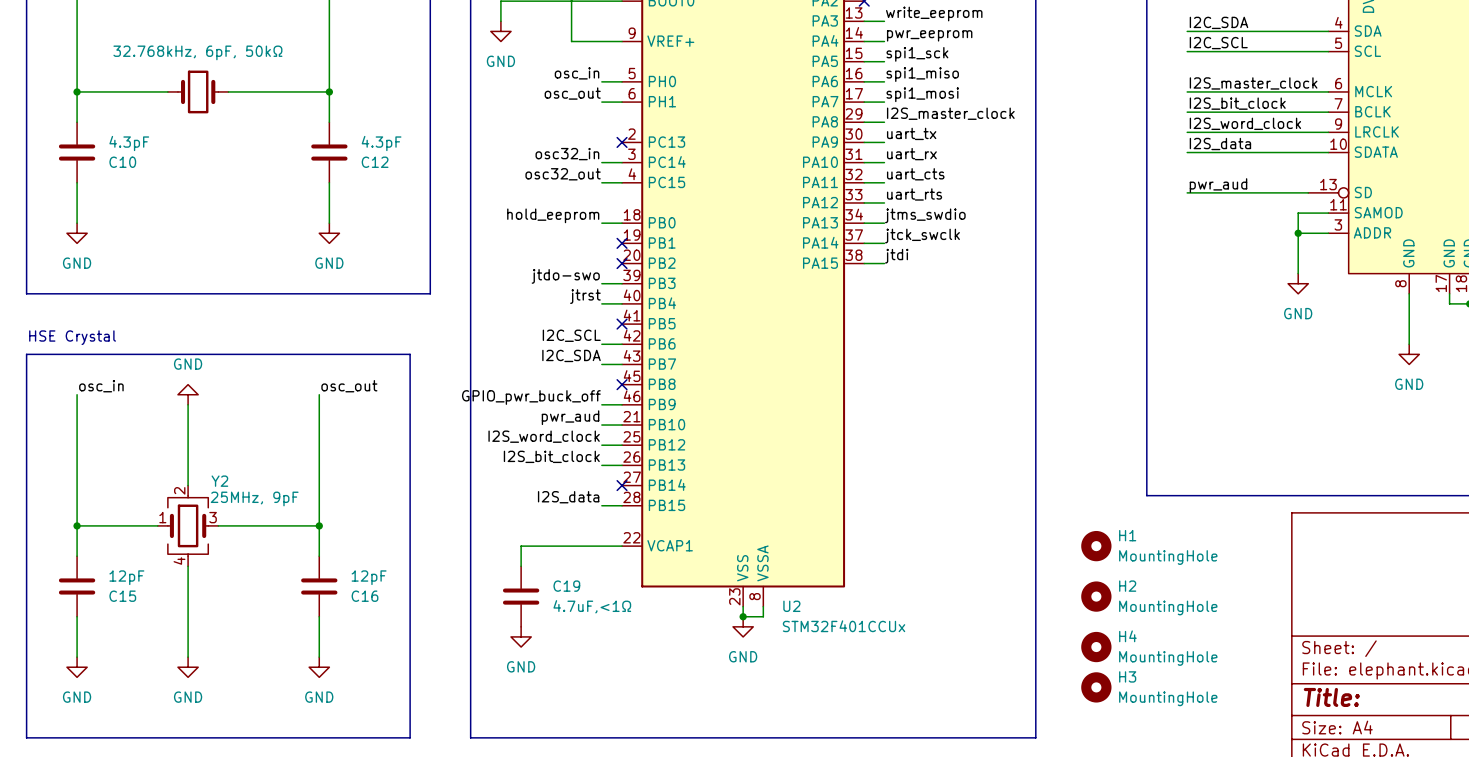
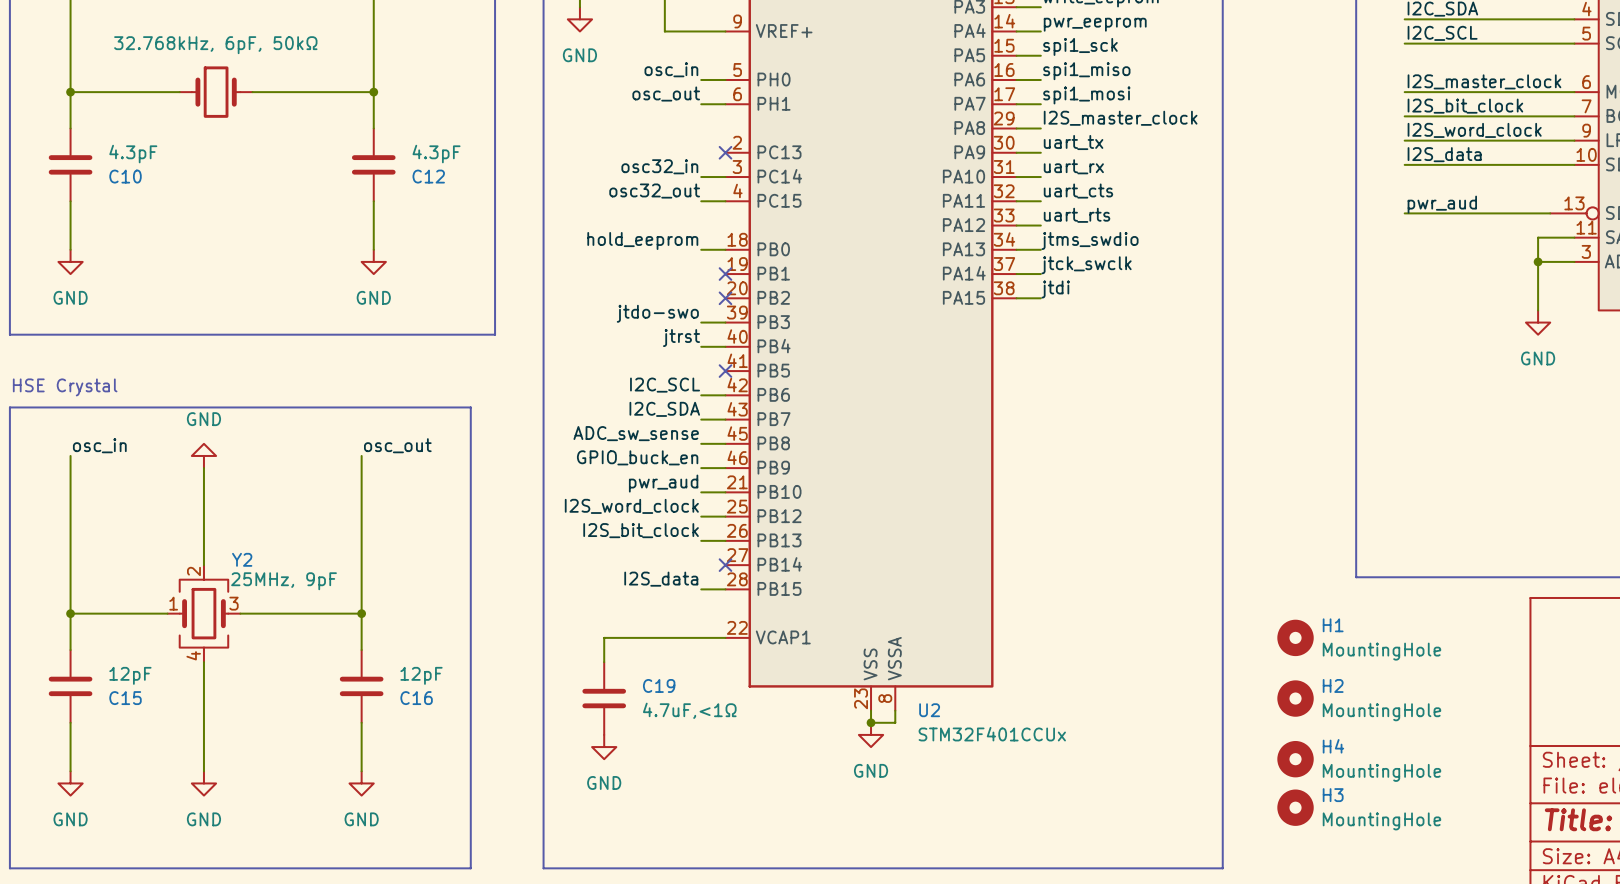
label: none -> ADC_sw_sense (636, 433)
wire: none -> (701, 443) (725, 443)
no-connect mark: (622, 384) -> none
label: GPIO_pwr_buck_off (531, 397) -> GPIO_buck_en (637, 457)

